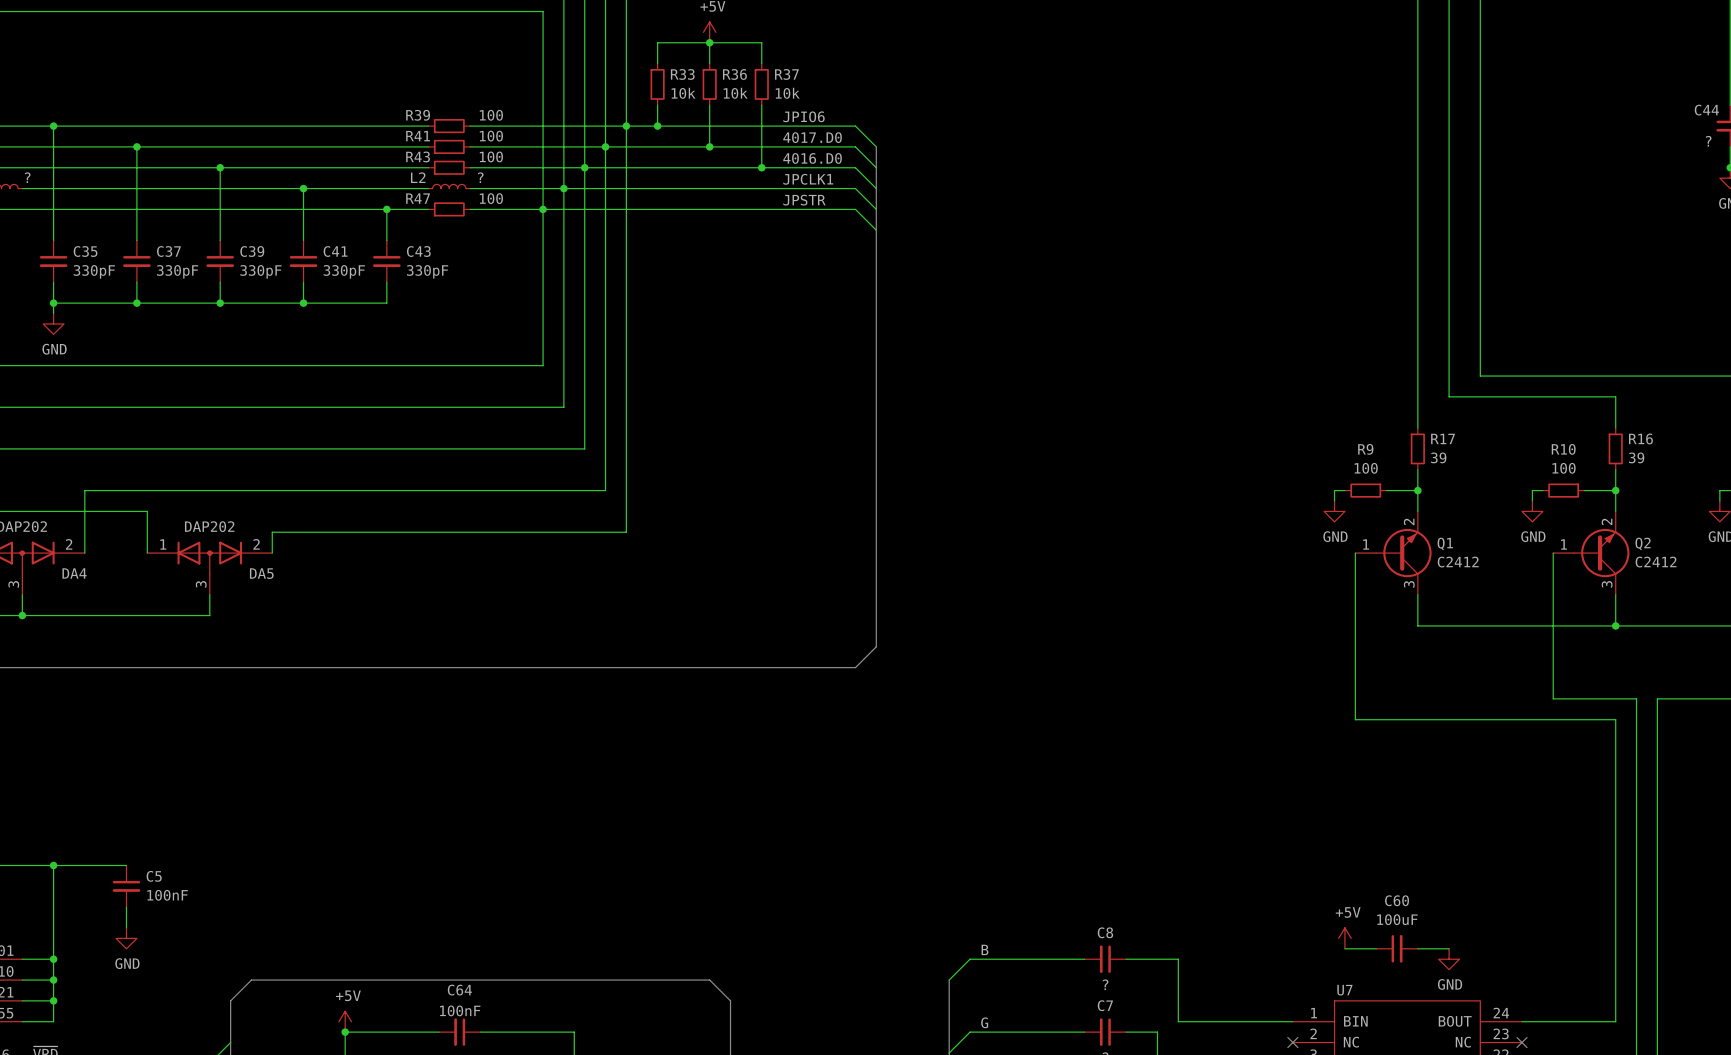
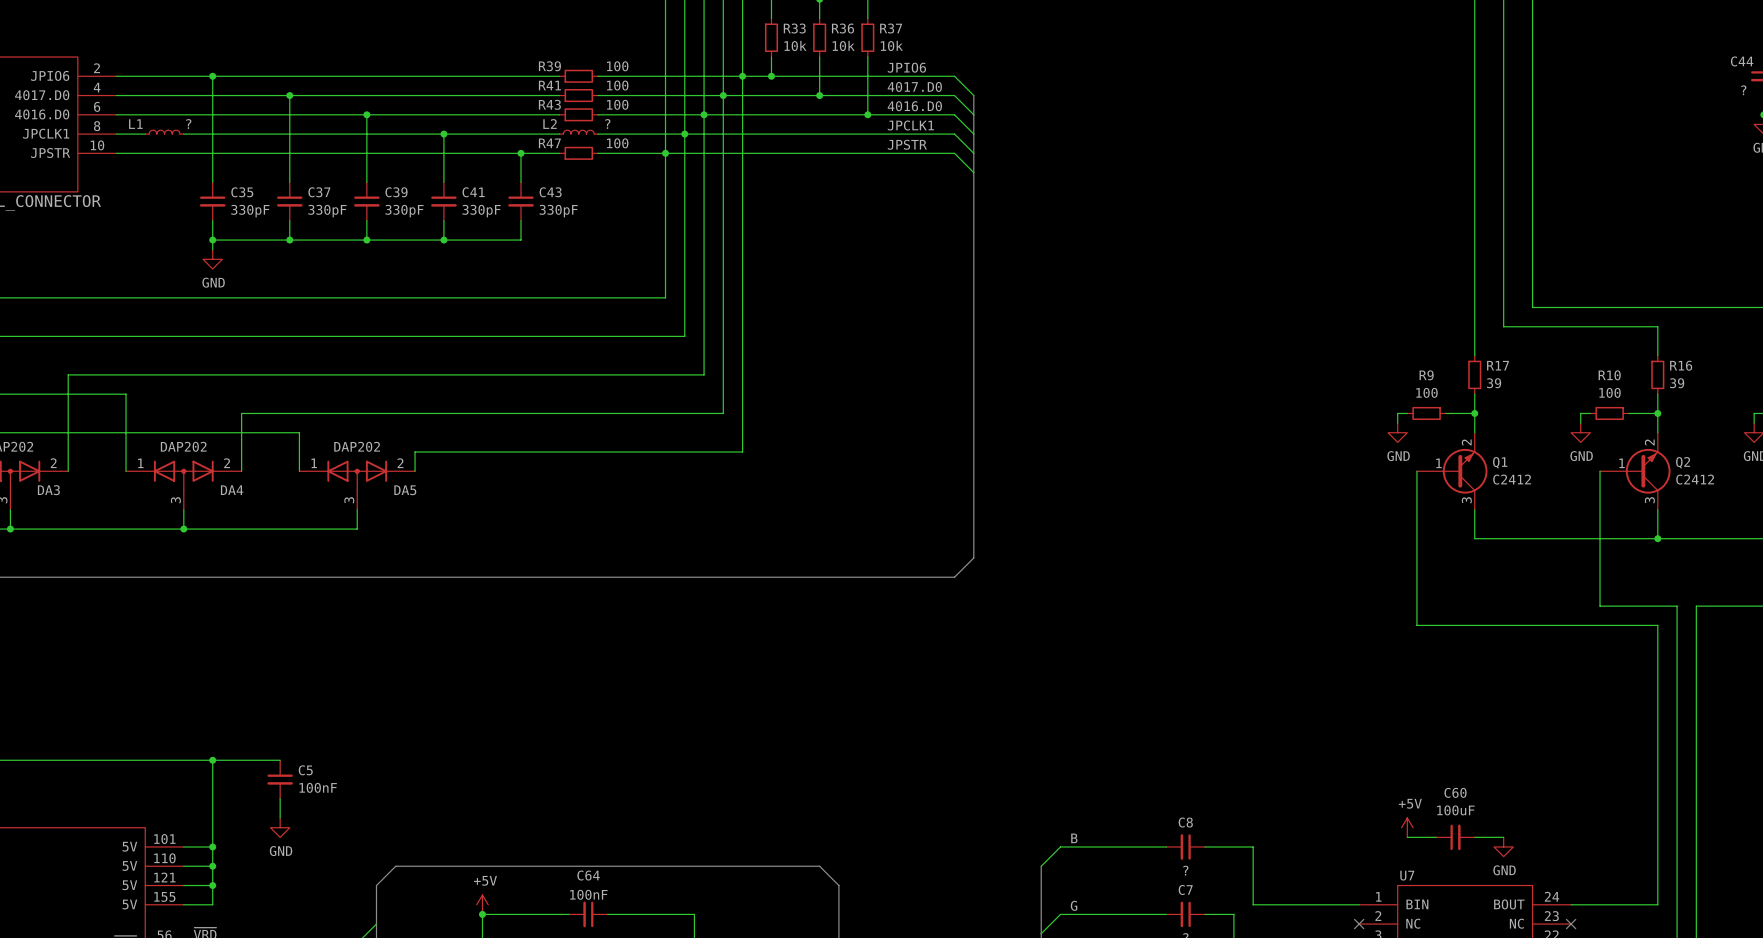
Q1 symbol: [1355, 511, 1432, 595] -> [1416, 432, 1488, 510]
Q2 symbol: [1553, 511, 1630, 595] -> [1600, 432, 1671, 510]

